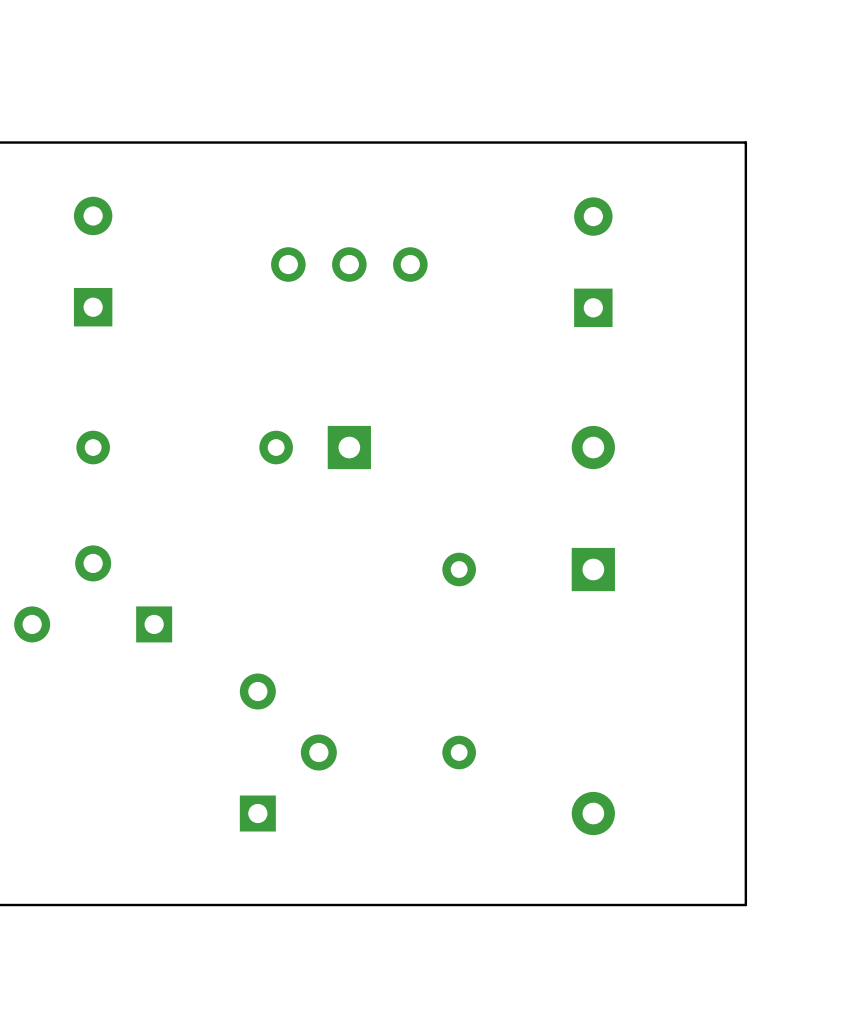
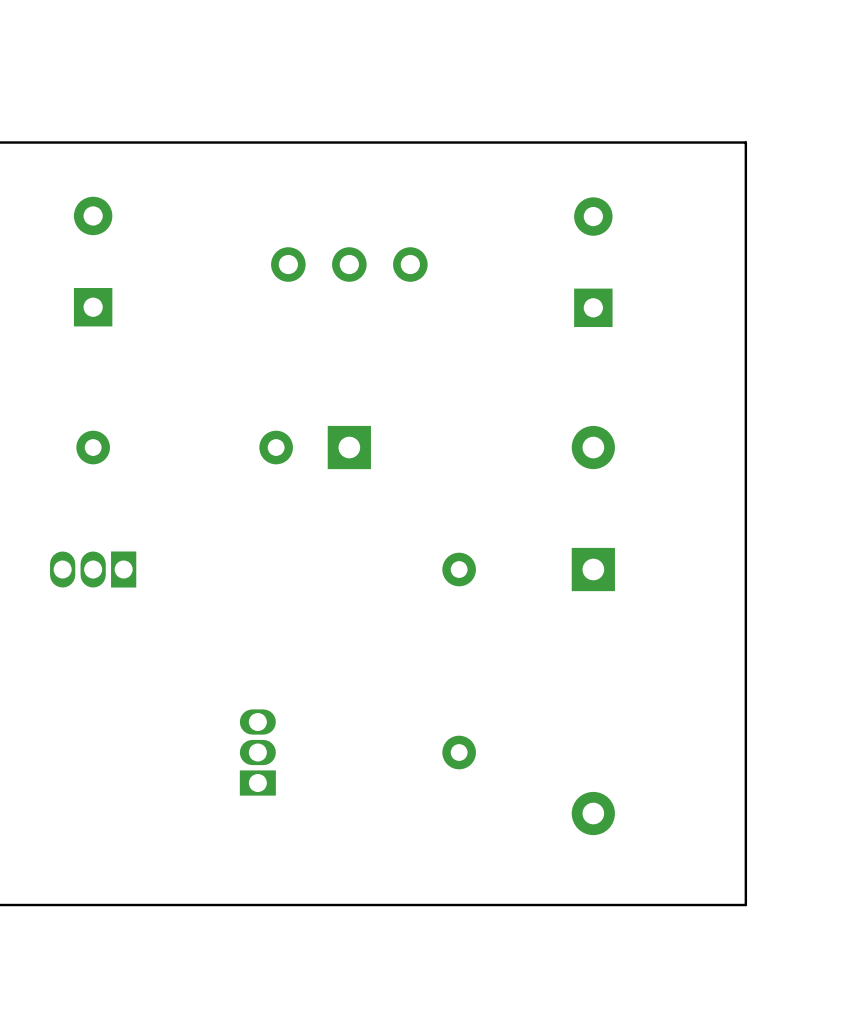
part: none -> (93, 569)
part: (93, 593) -> none
part: none -> (257, 752)
part: (288, 752) -> none

